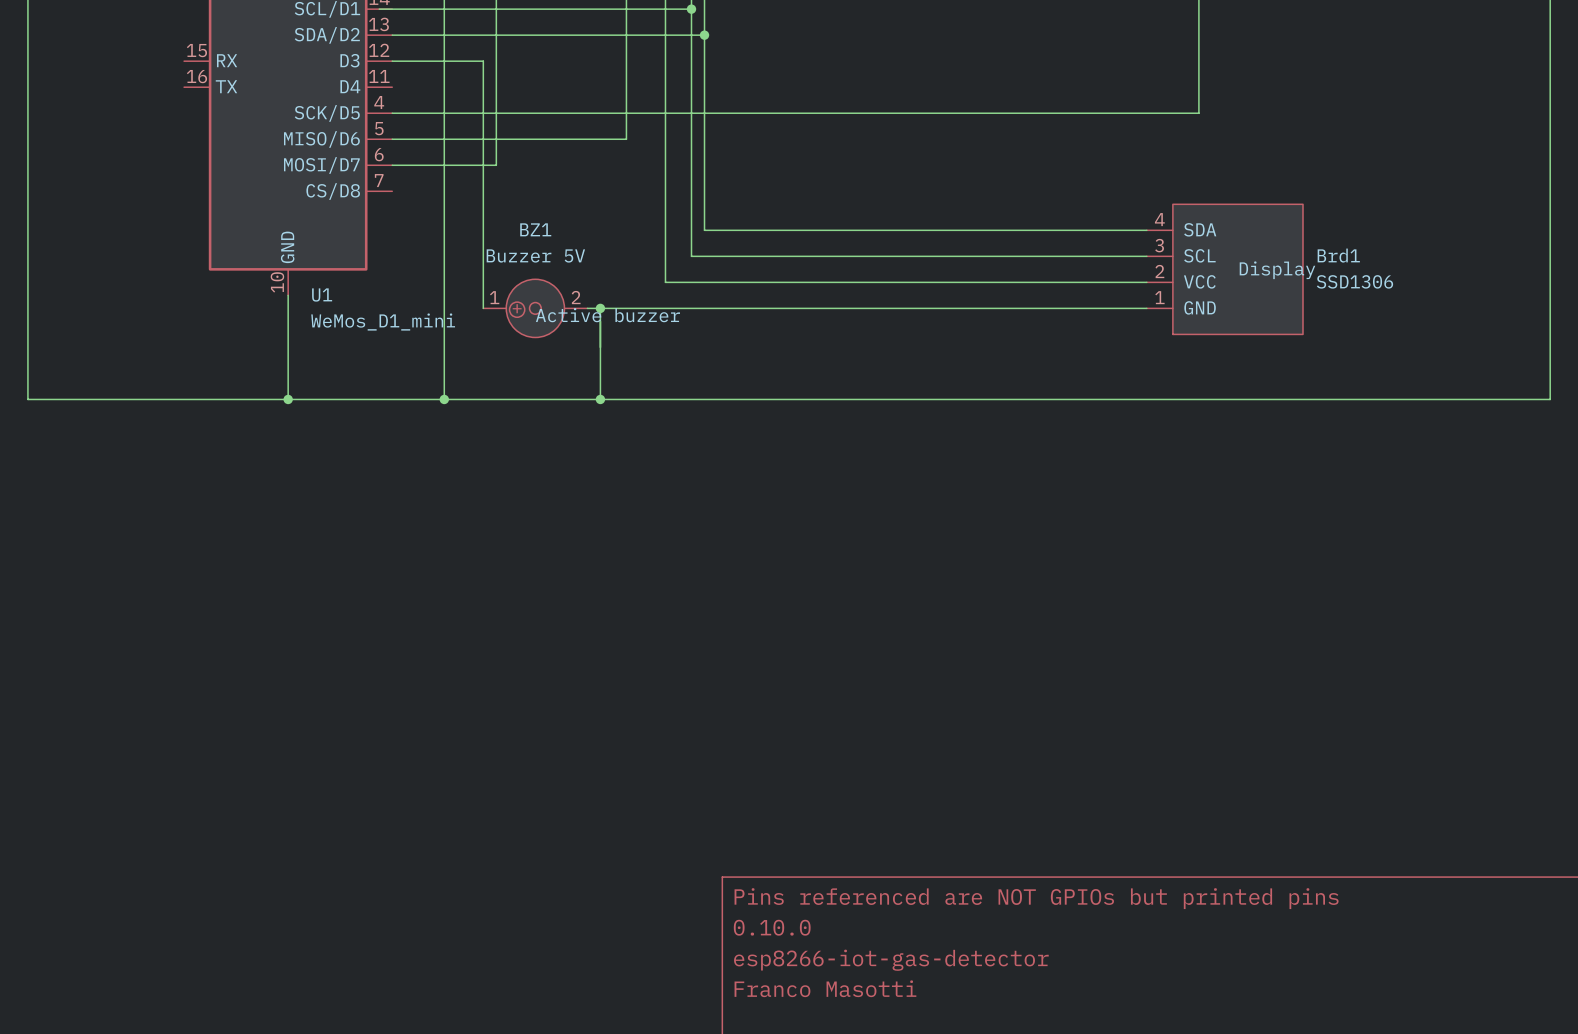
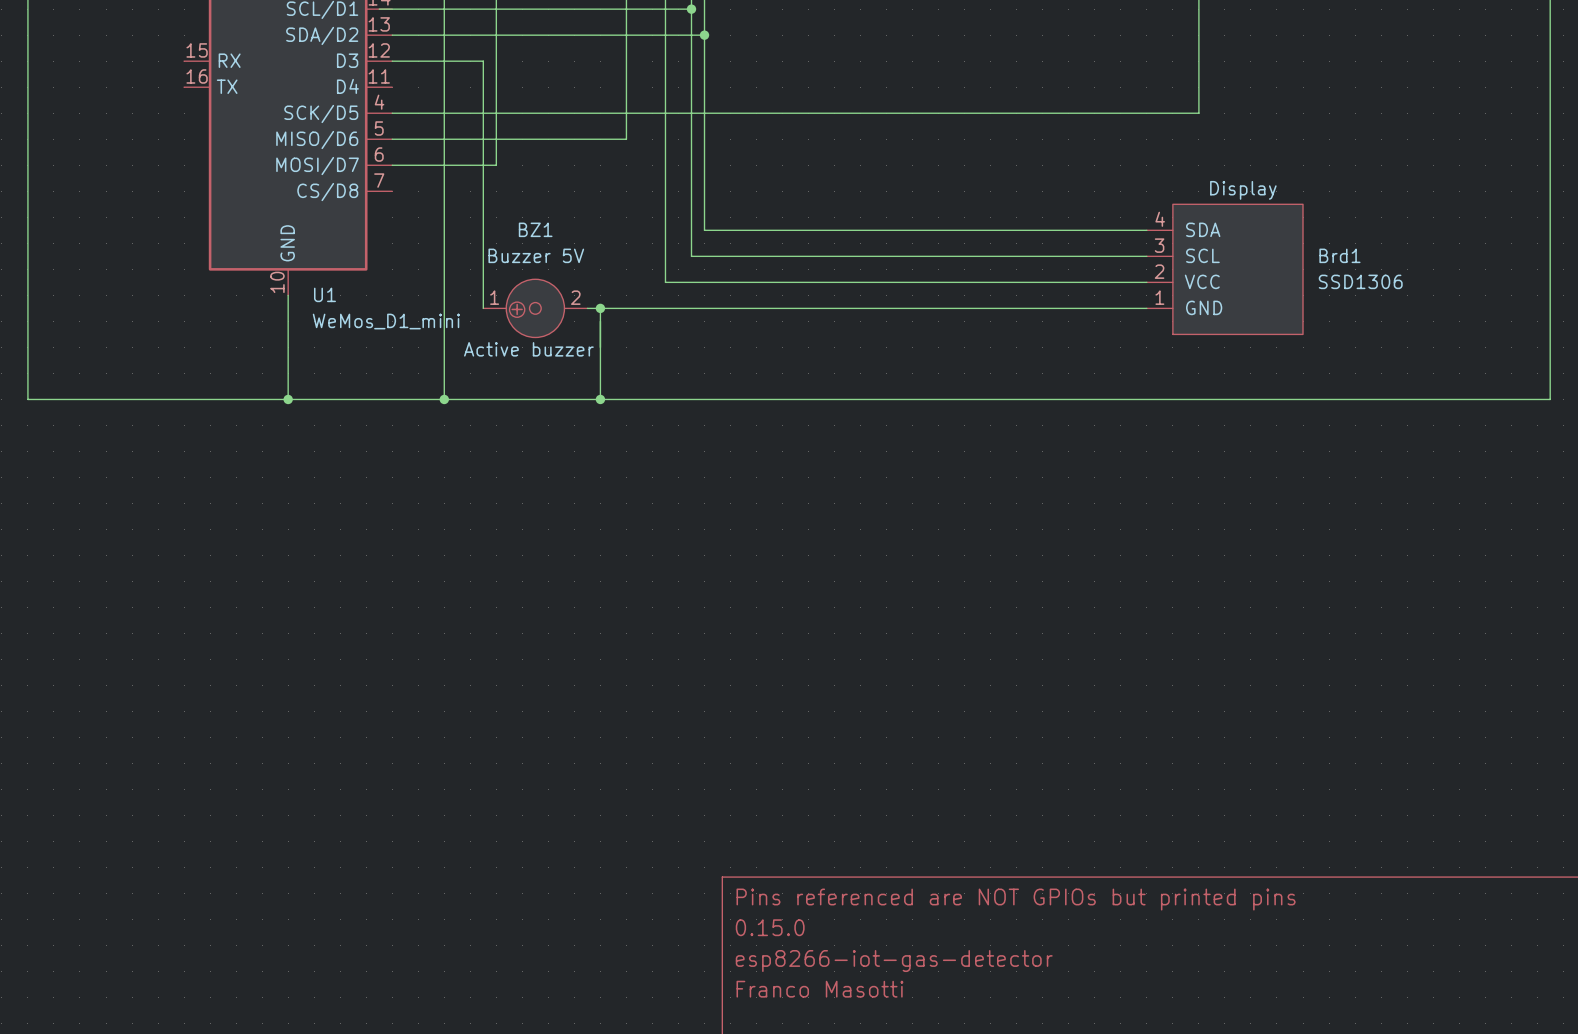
Brd1 text position: Display (1277, 270) -> Display (1243, 190)
BZ1 text position: Active buzzer (607, 315) -> Active buzzer (528, 349)
title block: 0.10.0 (772, 927) -> 0.15.0 (770, 927)

